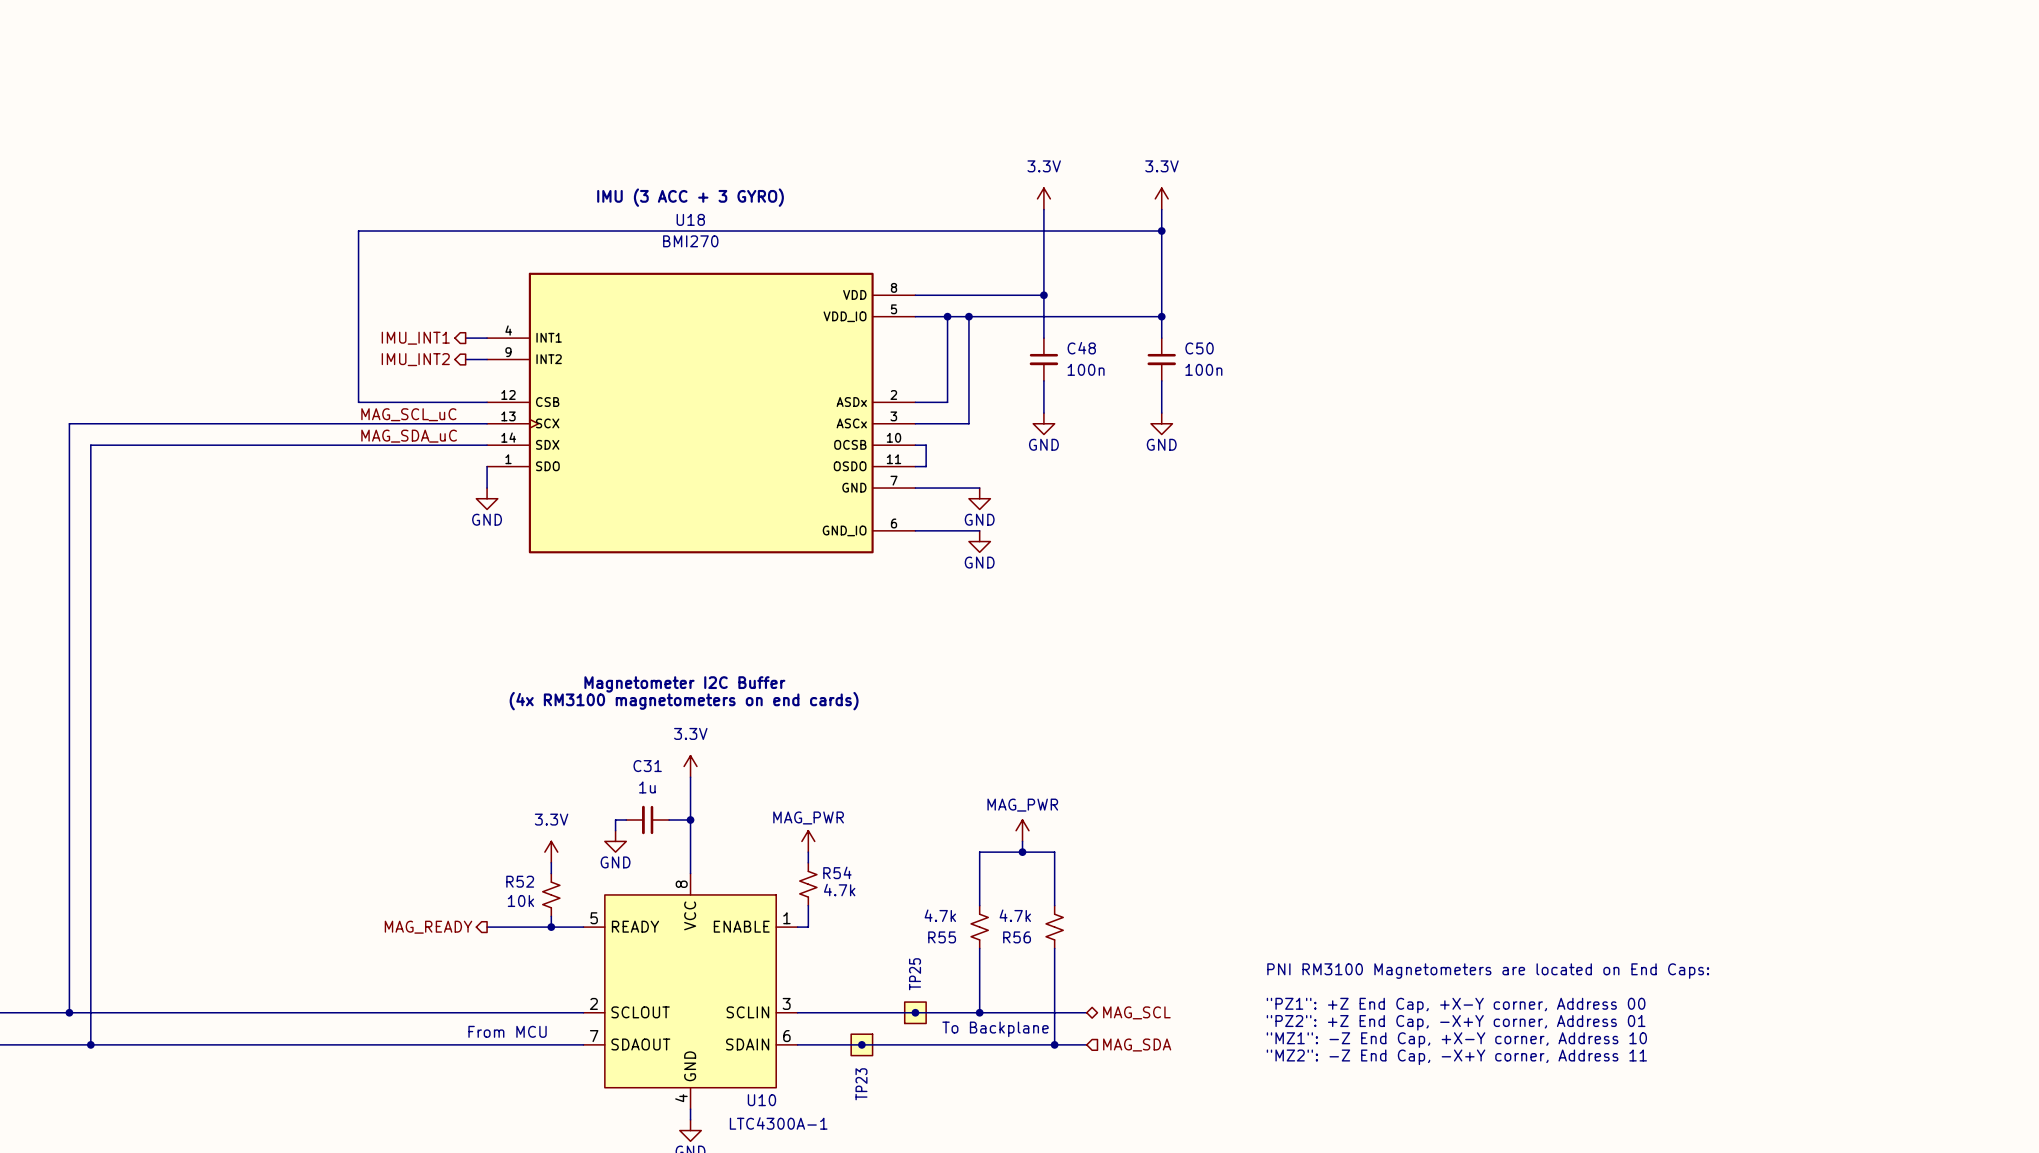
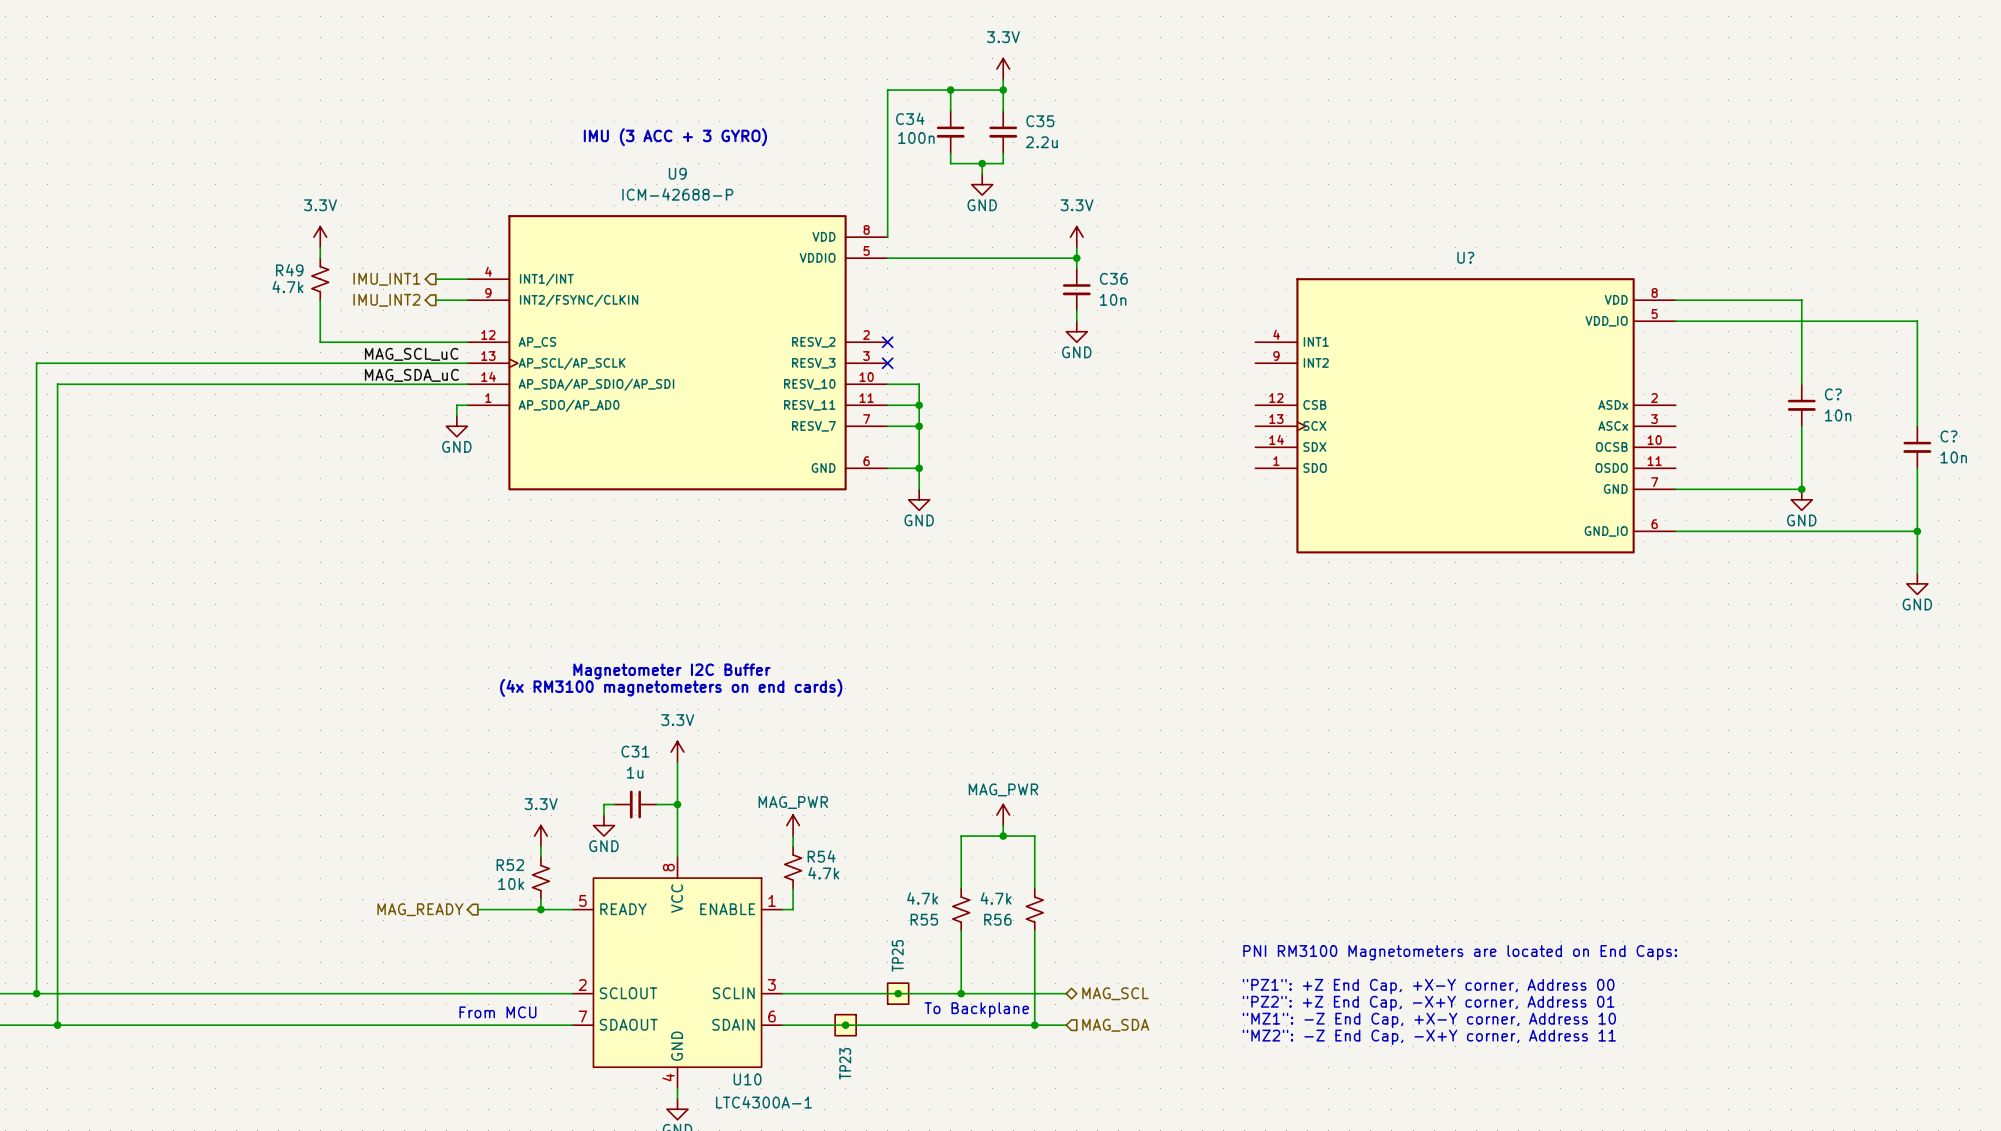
power symbol: none -> 3.3V (1003, 69)
wire: none -> (1003, 79) (1003, 111)
wire: none -> (950, 90) (950, 111)
junction: none -> (950, 90)
wire: none -> (1003, 90) (887, 90) (887, 237)
junction: none -> (1003, 90)
C34: none -> 100n (950, 132)
C35: none -> 2.2u (1003, 132)
wire: none -> (950, 153) (950, 163) (1003, 163) (1003, 153)
wire: none -> (982, 163) (982, 174)
junction: none -> (982, 163)
power symbol: none -> GND (982, 184)
text position: IMU (3 ACC + 3 GYRO) (690, 197) -> IMU (3 ACC + 3 GYRO) (675, 137)
power symbol: 3.3V (1043, 198) -> none
power symbol: 3.3V (1161, 198) -> none
wire: (1043, 209) (1043, 338) -> none
wire: (1161, 209) (1161, 338) -> none
wire: (1161, 231) (358, 231) (358, 402) (487, 402) -> none
junction: (1161, 231) -> none
power symbol: none -> 3.3V (320, 237)
power symbol: none -> 3.3V (1076, 237)
wire: none -> (320, 247) (320, 258)
wire: none -> (1076, 247) (1076, 268)
wire: none -> (887, 258) (1076, 258)
junction: none -> (1076, 258)
R49: none -> 4.7k (320, 279)
wire: none -> (435, 279) (467, 279)
wire: (915, 295) (1043, 295) -> none
junction: (1043, 295) -> none
C36: none -> 10n (1076, 289)
wire: none -> (320, 300) (320, 342) (467, 342)
wire: none -> (435, 300) (467, 300)
wire: none -> (1675, 300) (1801, 300) (1801, 384)
wire: (915, 316) (1161, 316) -> none
wire: (947, 316) (947, 402) (915, 402) -> none
junction: (947, 316) -> none
wire: (968, 316) (968, 423) (915, 423) -> none
junction: (968, 316) -> none
wire: none -> (1076, 310) (1076, 321)
junction: (1161, 316) -> none
wire: none -> (1675, 321) (1917, 321) (1917, 426)
hierarchical label position: IMU_INT1 (415, 338) -> IMU_INT1 (386, 279)
wire: (465, 338) (487, 338) -> none
power symbol: none -> GND (1076, 331)
no-connect mark: none -> (887, 342)
hierarchical label position: IMU_INT2 (415, 359) -> IMU_INT2 (386, 300)
wire: (465, 359) (487, 359) -> none
U9: none -> ICM-42688-P (677, 352)
C48: 100n (1043, 359) -> none
C50: 100n (1161, 359) -> none
wire: none -> (467, 363) (36, 363) (36, 993)
no-connect mark: none -> (887, 363)
wire: (1043, 380) (1043, 413) -> none
wire: (1161, 380) (1161, 413) -> none
wire: none -> (467, 384) (57, 384) (57, 1025)
wire: none -> (887, 384) (919, 384) (919, 489)
wire: none -> (467, 405) (456, 405) (456, 415)
U18: BMI270 (701, 413) -> none
wire: none -> (887, 405) (919, 405)
junction: none -> (919, 405)
C?: none -> 10n (1801, 405)
label position: MAG_SCL_uC (408, 414) -> MAG_SCL_uC (411, 354)
wire: (487, 423) (69, 423) (69, 1012) -> none
power symbol: GND (1043, 423) -> none
power symbol: GND (1161, 423) -> none
U?: none -> (1465, 415)
wire: none -> (887, 426) (919, 426)
junction: none -> (919, 426)
wire: none -> (1801, 426) (1801, 489) (1675, 489)
label position: MAG_SDA_uC (409, 436) -> MAG_SDA_uC (411, 375)
wire: (487, 445) (90, 445) (90, 1044) -> none
wire: (915, 445) (926, 445) (926, 466) (915, 466) -> none
C?: none -> 10n (1917, 447)
wire: (487, 466) (487, 488) -> none
wire: none -> (887, 468) (919, 468)
junction: none -> (919, 468)
wire: none -> (1917, 468) (1917, 573)
wire: (915, 488) (979, 488) -> none
power symbol position: GND (487, 498) -> GND (456, 426)
power symbol: GND (979, 498) -> none
junction: none -> (1801, 489)
power symbol: none -> GND (919, 499)
power symbol: none -> GND (1801, 499)
wire: (915, 530) (979, 530) -> none
power symbol: GND (979, 541) -> none
wire: none -> (1675, 531) (1917, 531)
junction: none -> (1917, 531)
power symbol: none -> GND (1917, 583)
junction: none -> (36, 993)
junction: (69, 1012) -> none
junction: none -> (57, 1025)
junction: (90, 1044) -> none

